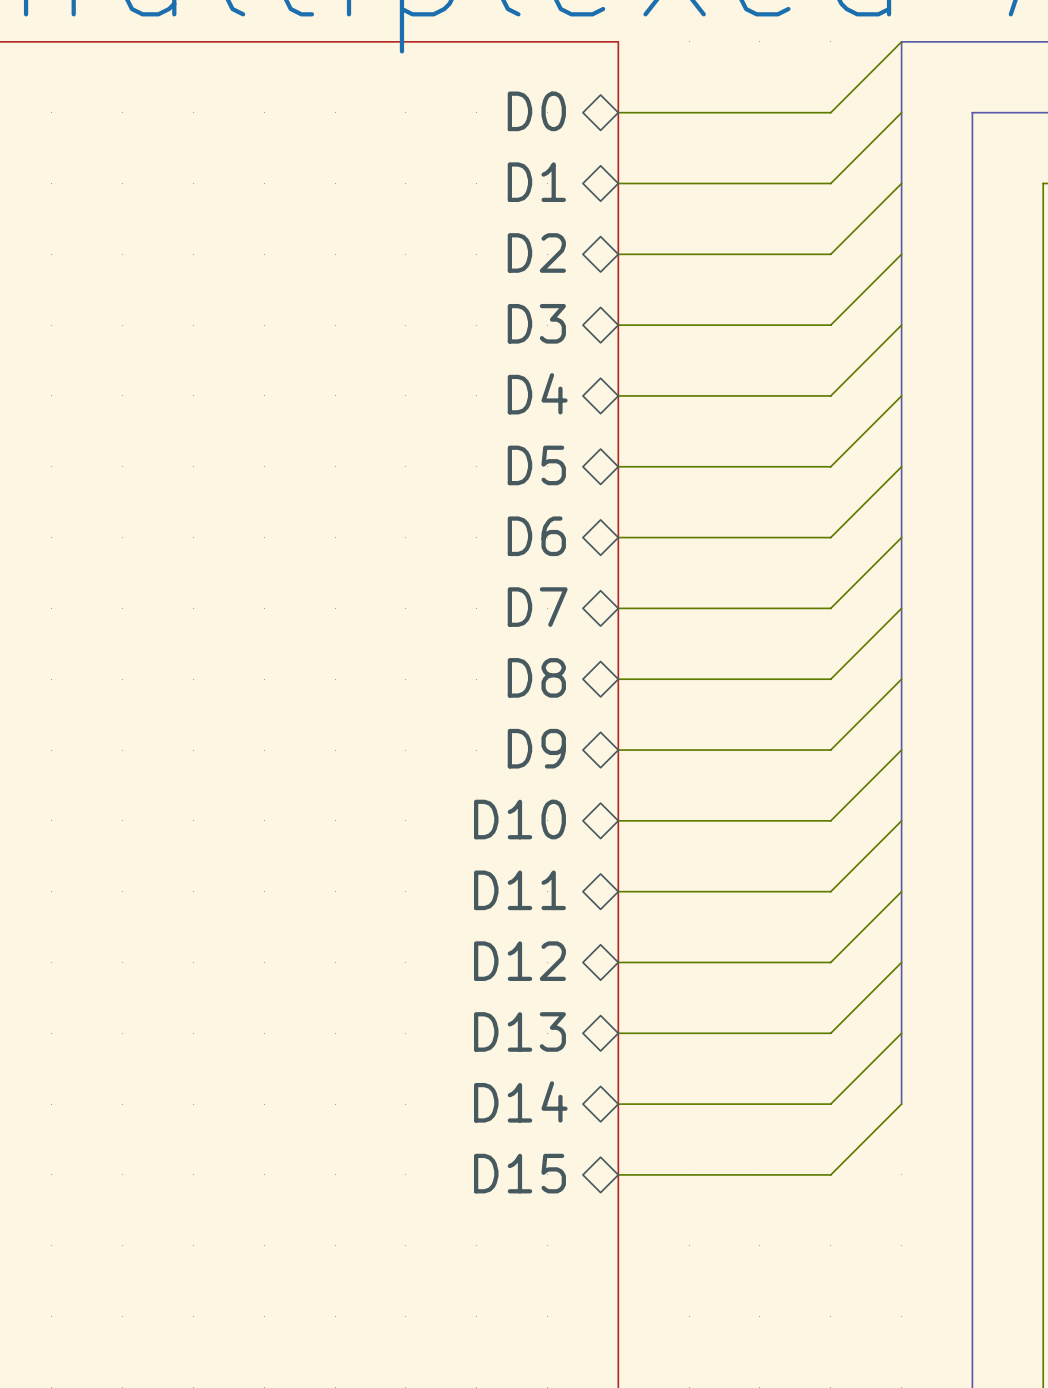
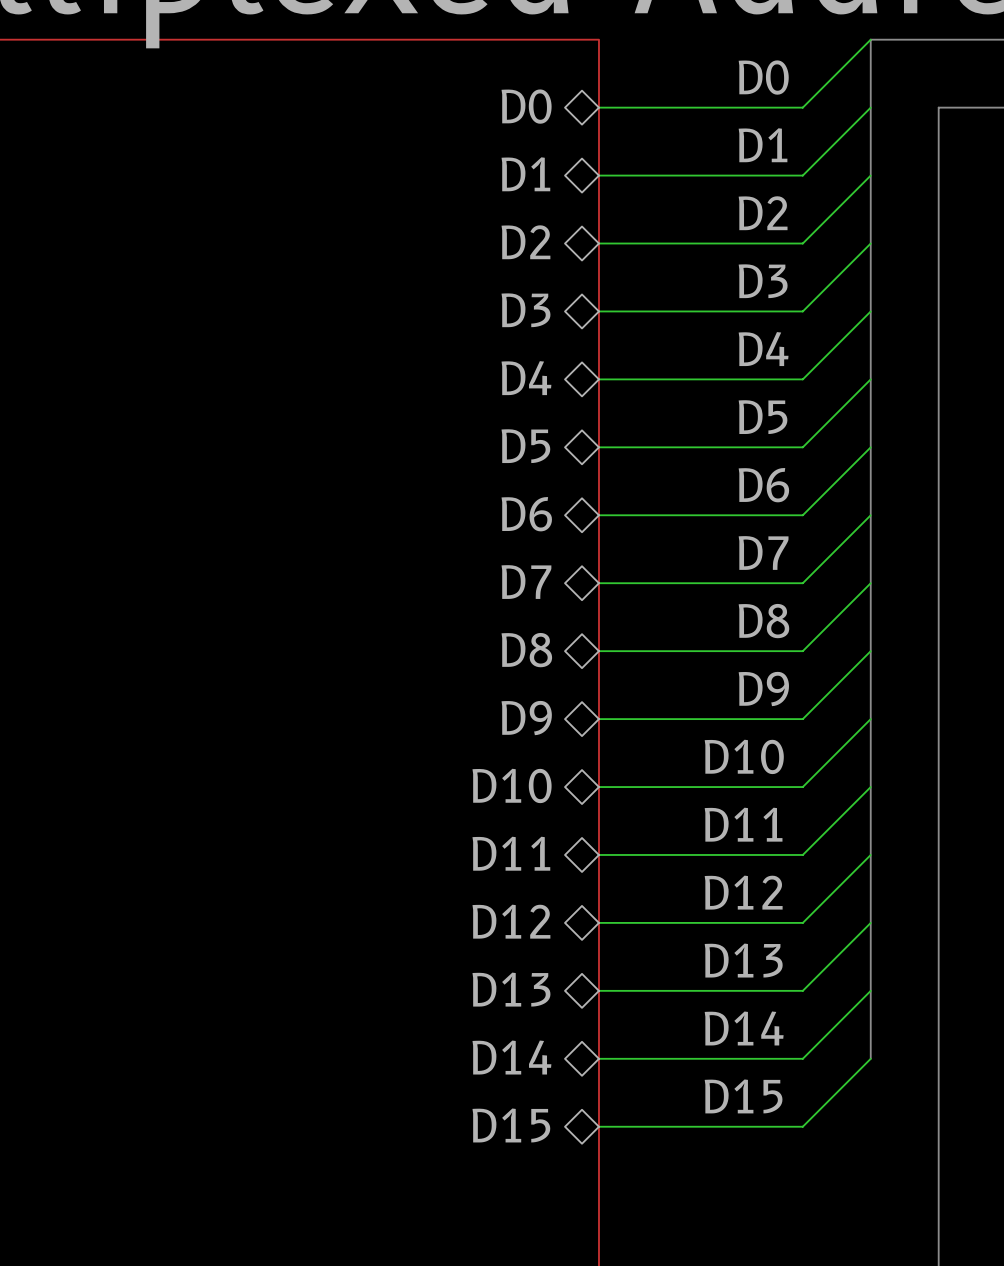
label: none -> D0 (763, 77)
label: none -> D1 (763, 145)
label: none -> D2 (763, 213)
label: none -> D3 (763, 281)
label: none -> D4 (763, 349)
label: none -> D5 (763, 417)
label: none -> D6 (763, 485)
label: none -> D7 (763, 553)
label: none -> D8 (763, 621)
label: none -> D9 (763, 689)
label: none -> D10 (744, 756)
label: none -> D11 (743, 824)
label: none -> D12 (743, 892)
label: none -> D13 (743, 960)
label: none -> D14 (744, 1028)
label: none -> D15 (743, 1096)

